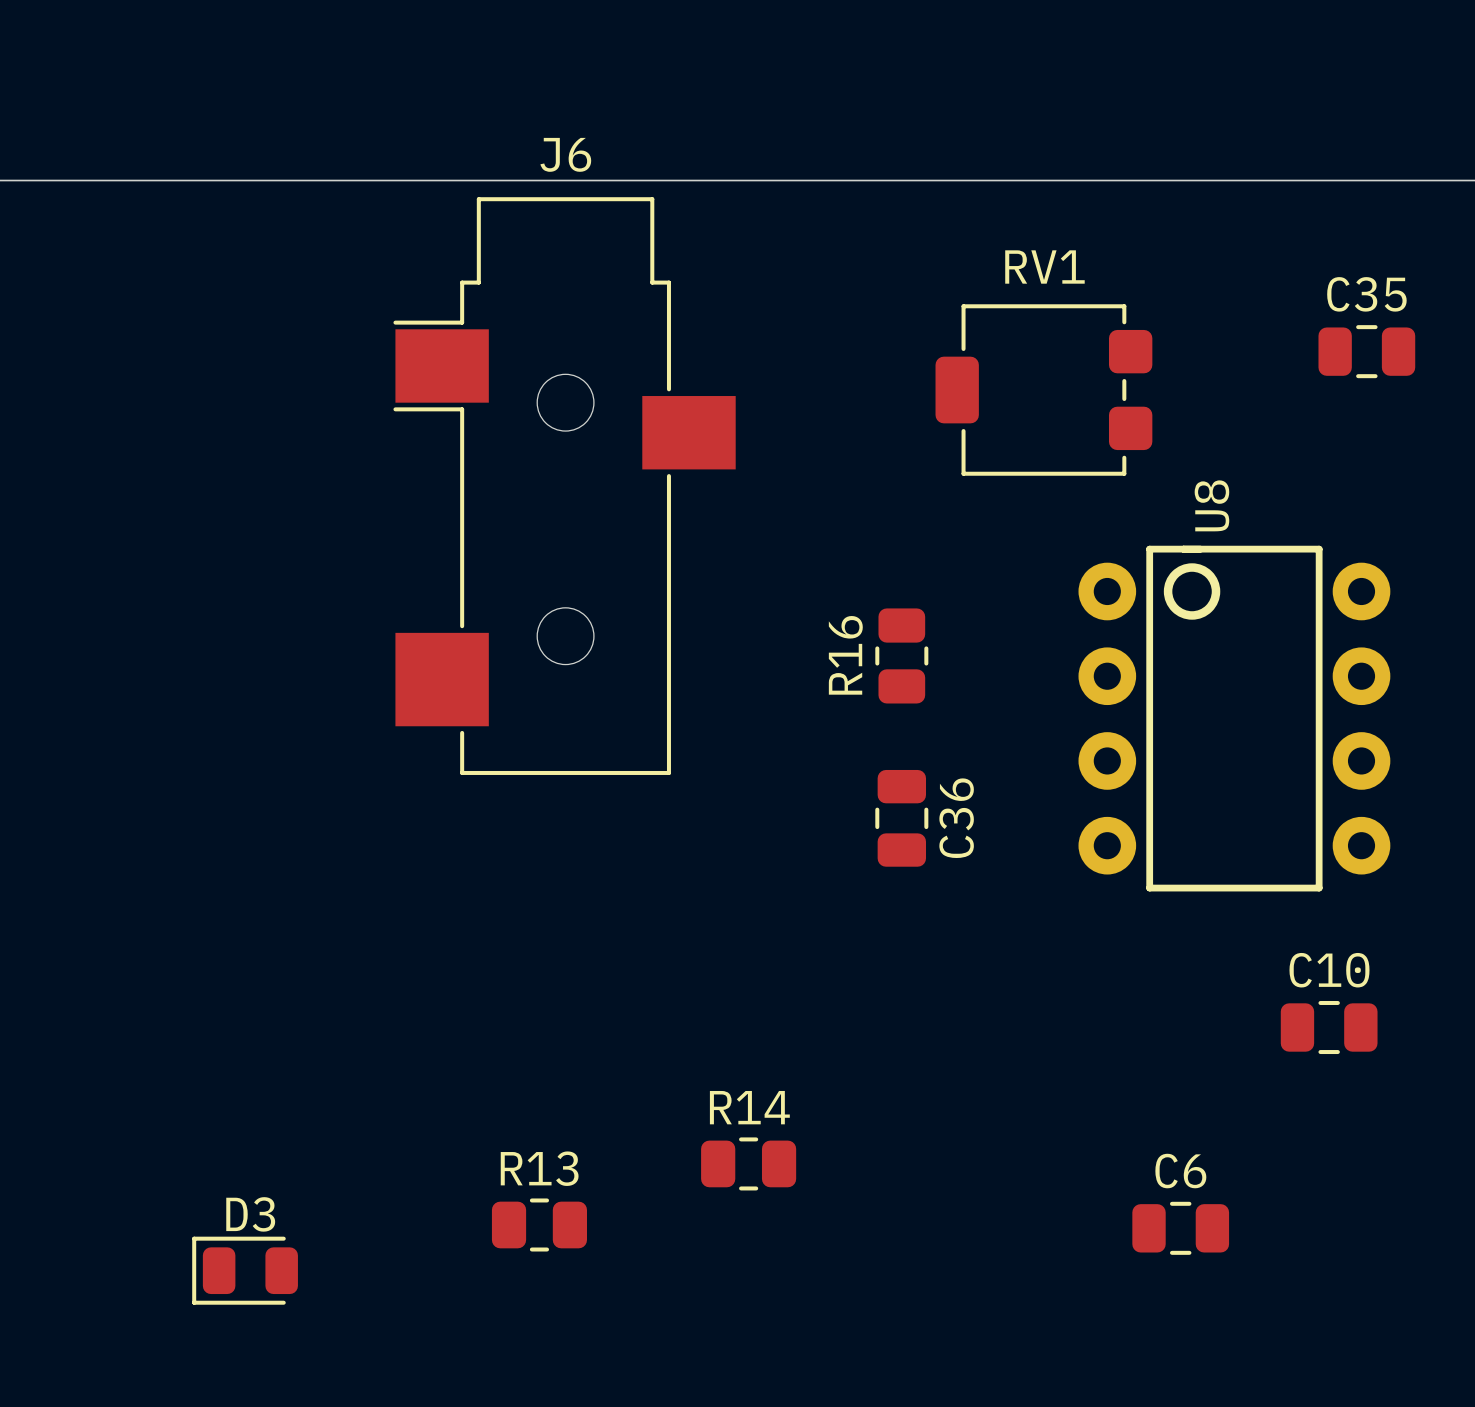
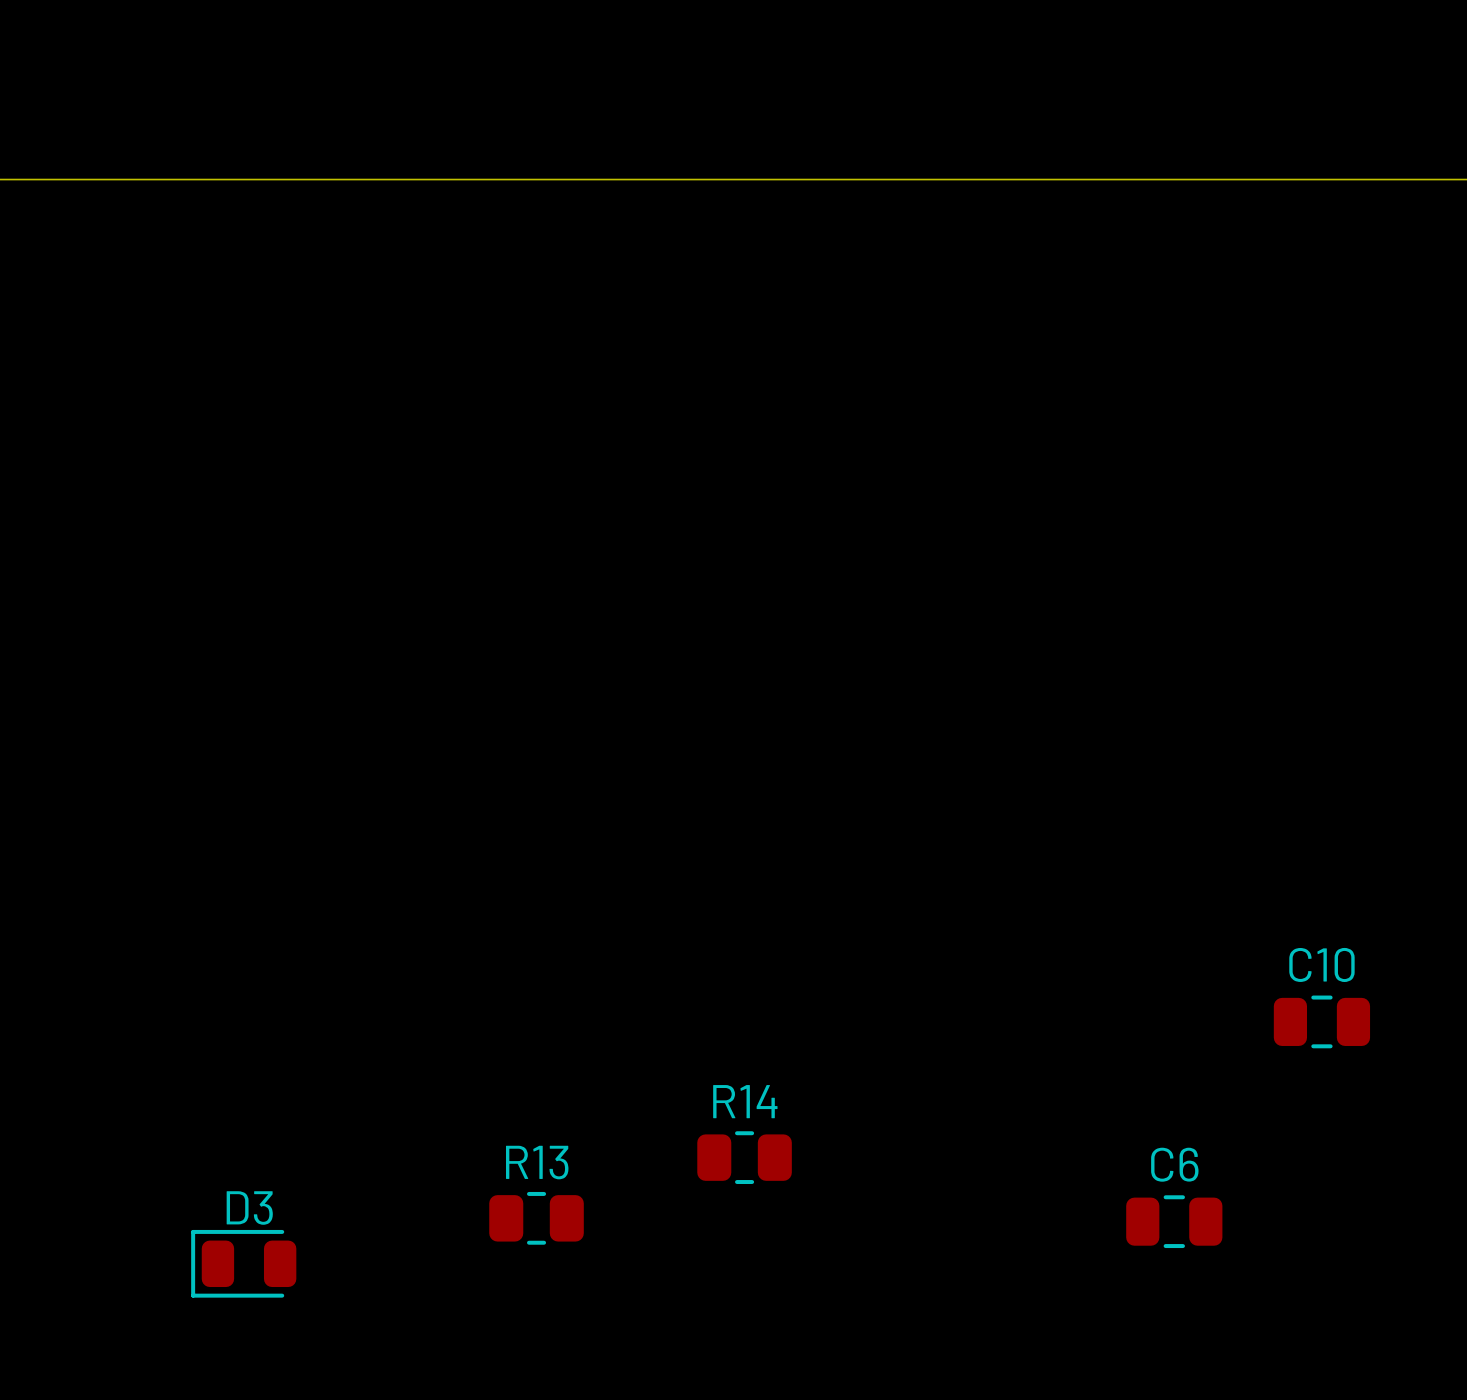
C35: (1366, 351) -> none
RV1: (1043, 390) -> none
J6: (564, 486) -> none
R16: (901, 655) -> none
U8: (1234, 718) -> none
C36: (901, 818) -> none

